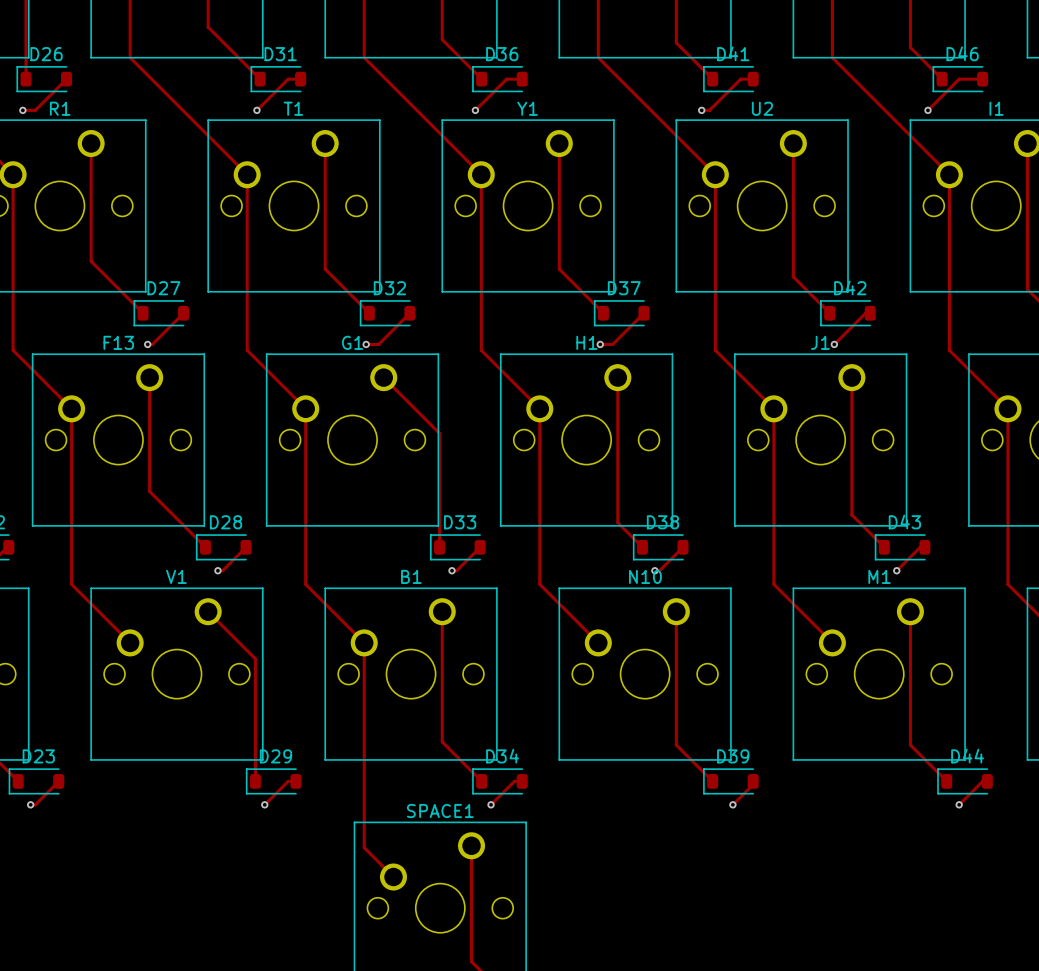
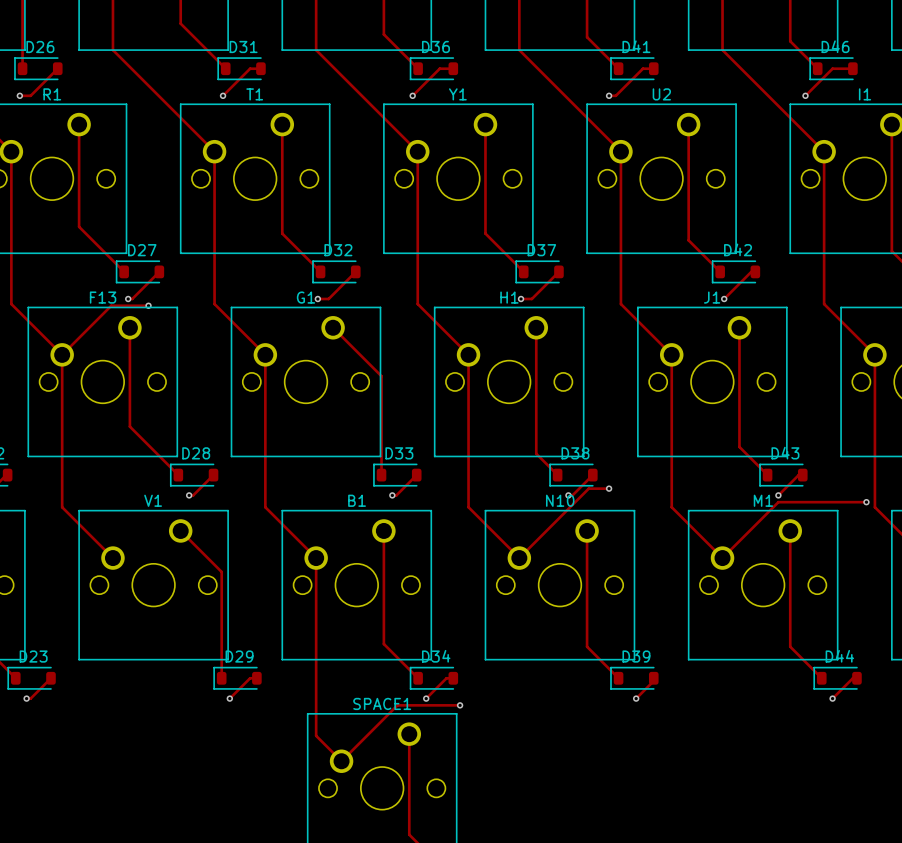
track: none -> (148, 305) (111, 305) (62, 354)
via: none -> (148, 305)
track: none -> (609, 488) (588, 488) (519, 558)
via: none -> (609, 488)
track: none -> (866, 502) (778, 502) (722, 558)
via: none -> (866, 502)
track: none -> (460, 705) (397, 705) (341, 761)
via: none -> (460, 705)

